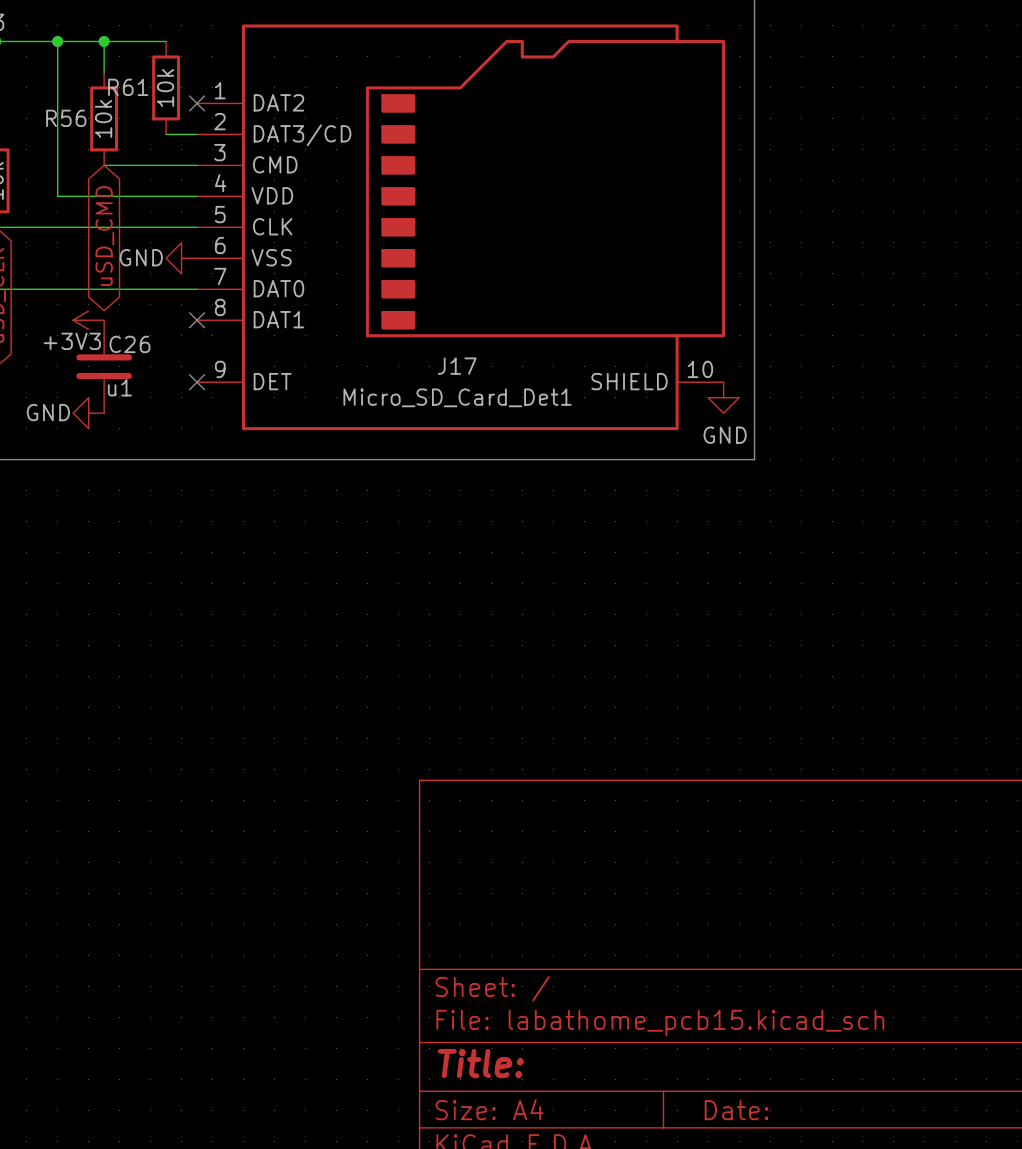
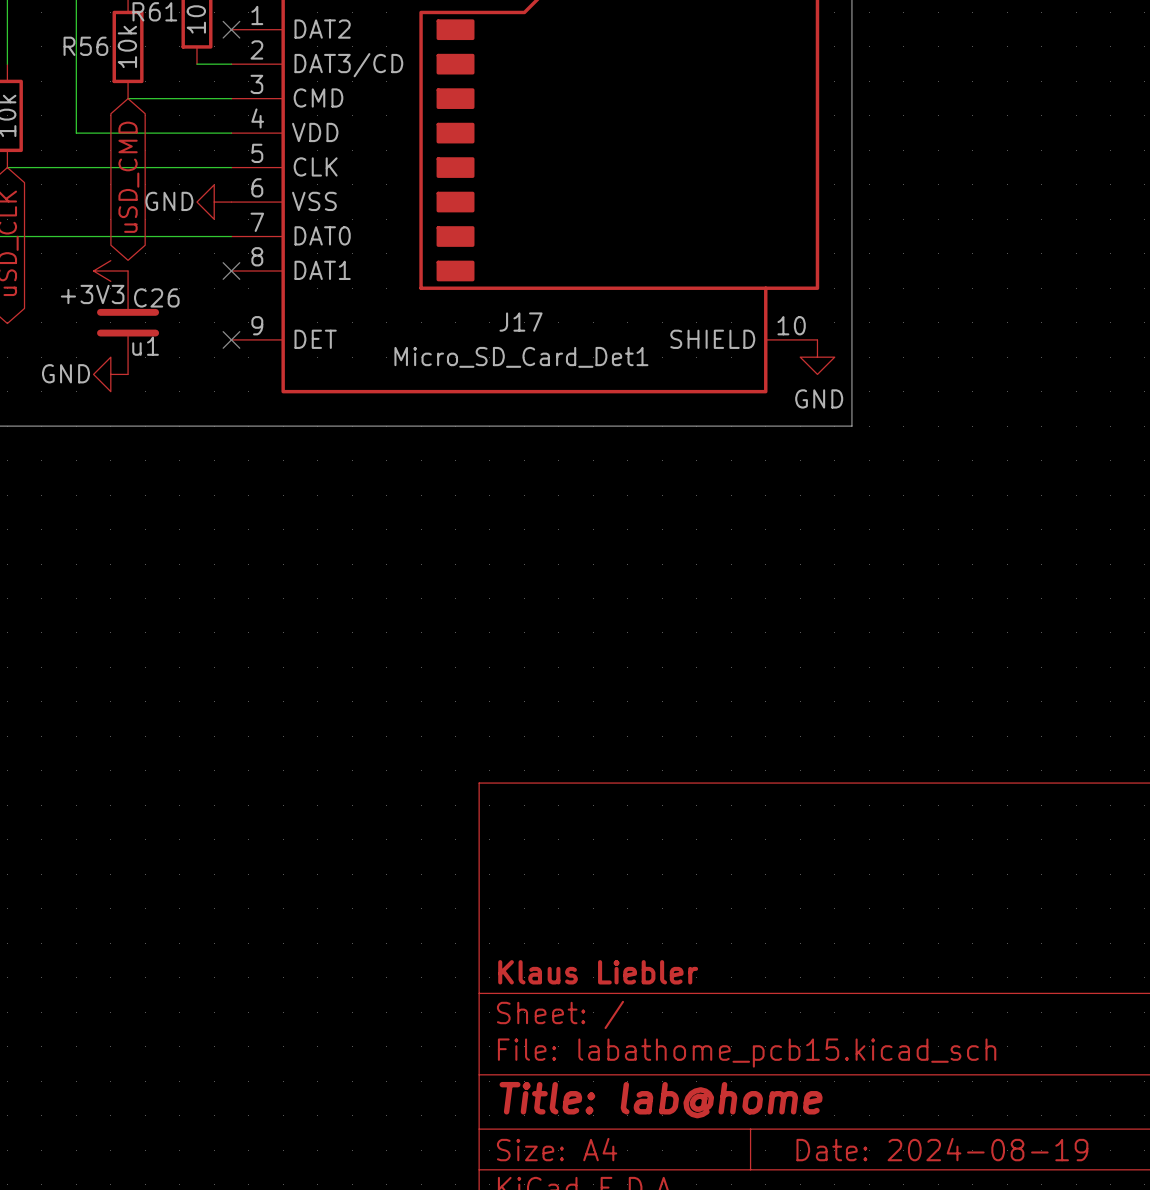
title block: none -> Klaus Liebler (598, 972)
title block: Title: (480, 1063) -> Title: lab@home (661, 1100)
title block: Date: (736, 1110) -> Date: 2024-08-19 (942, 1149)

